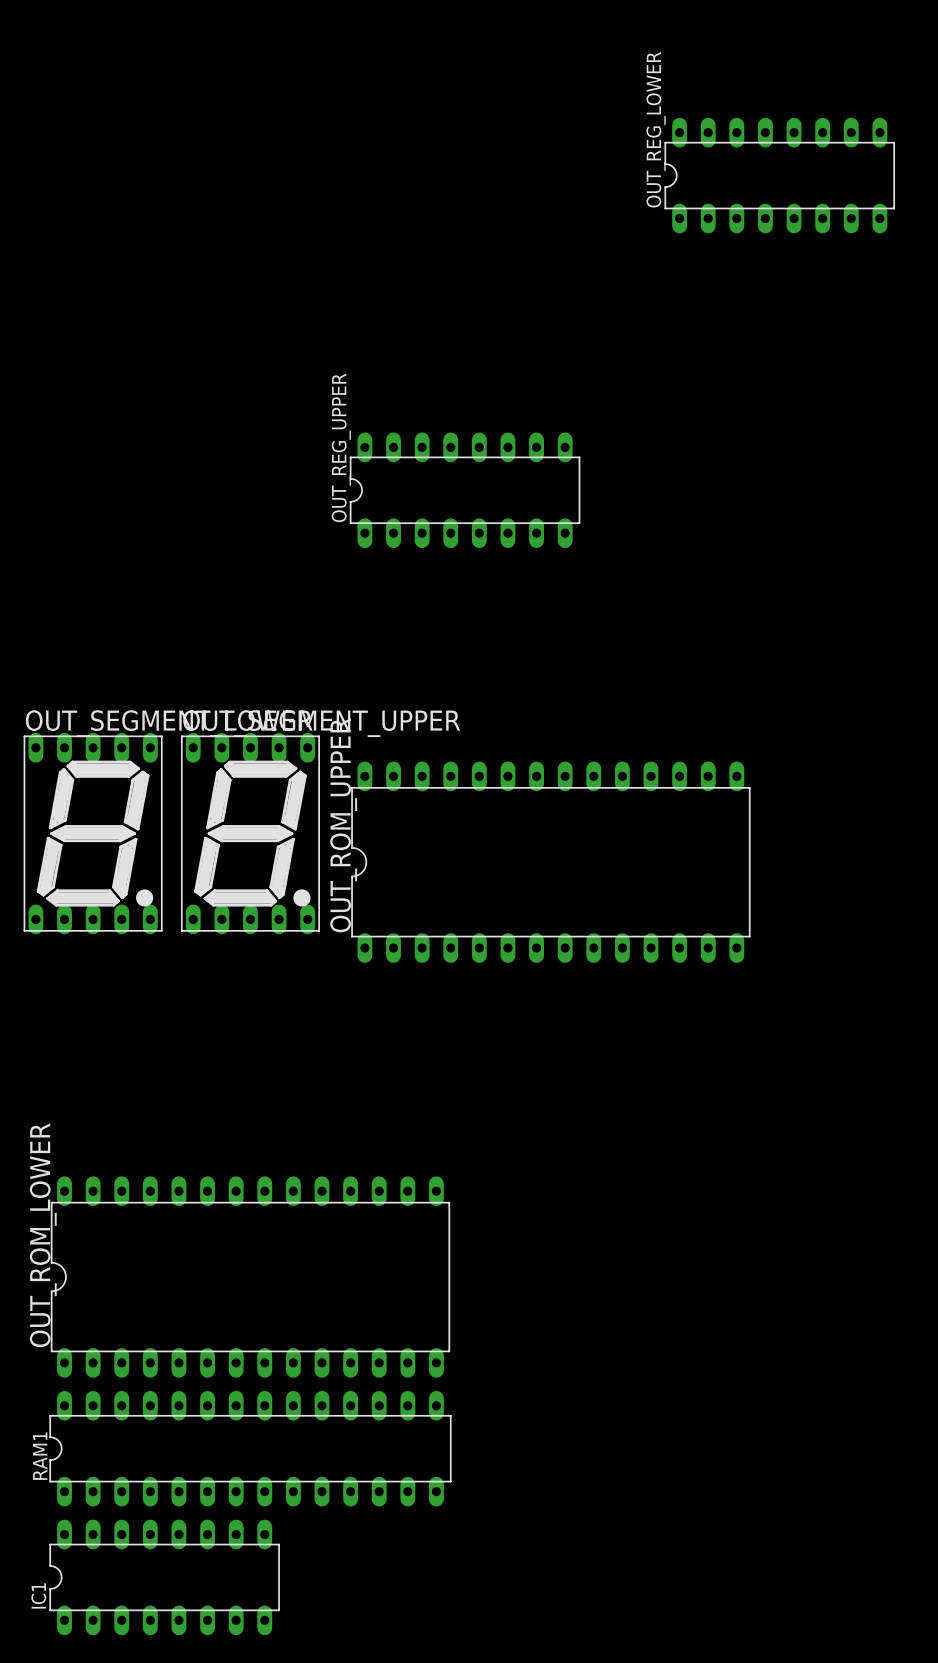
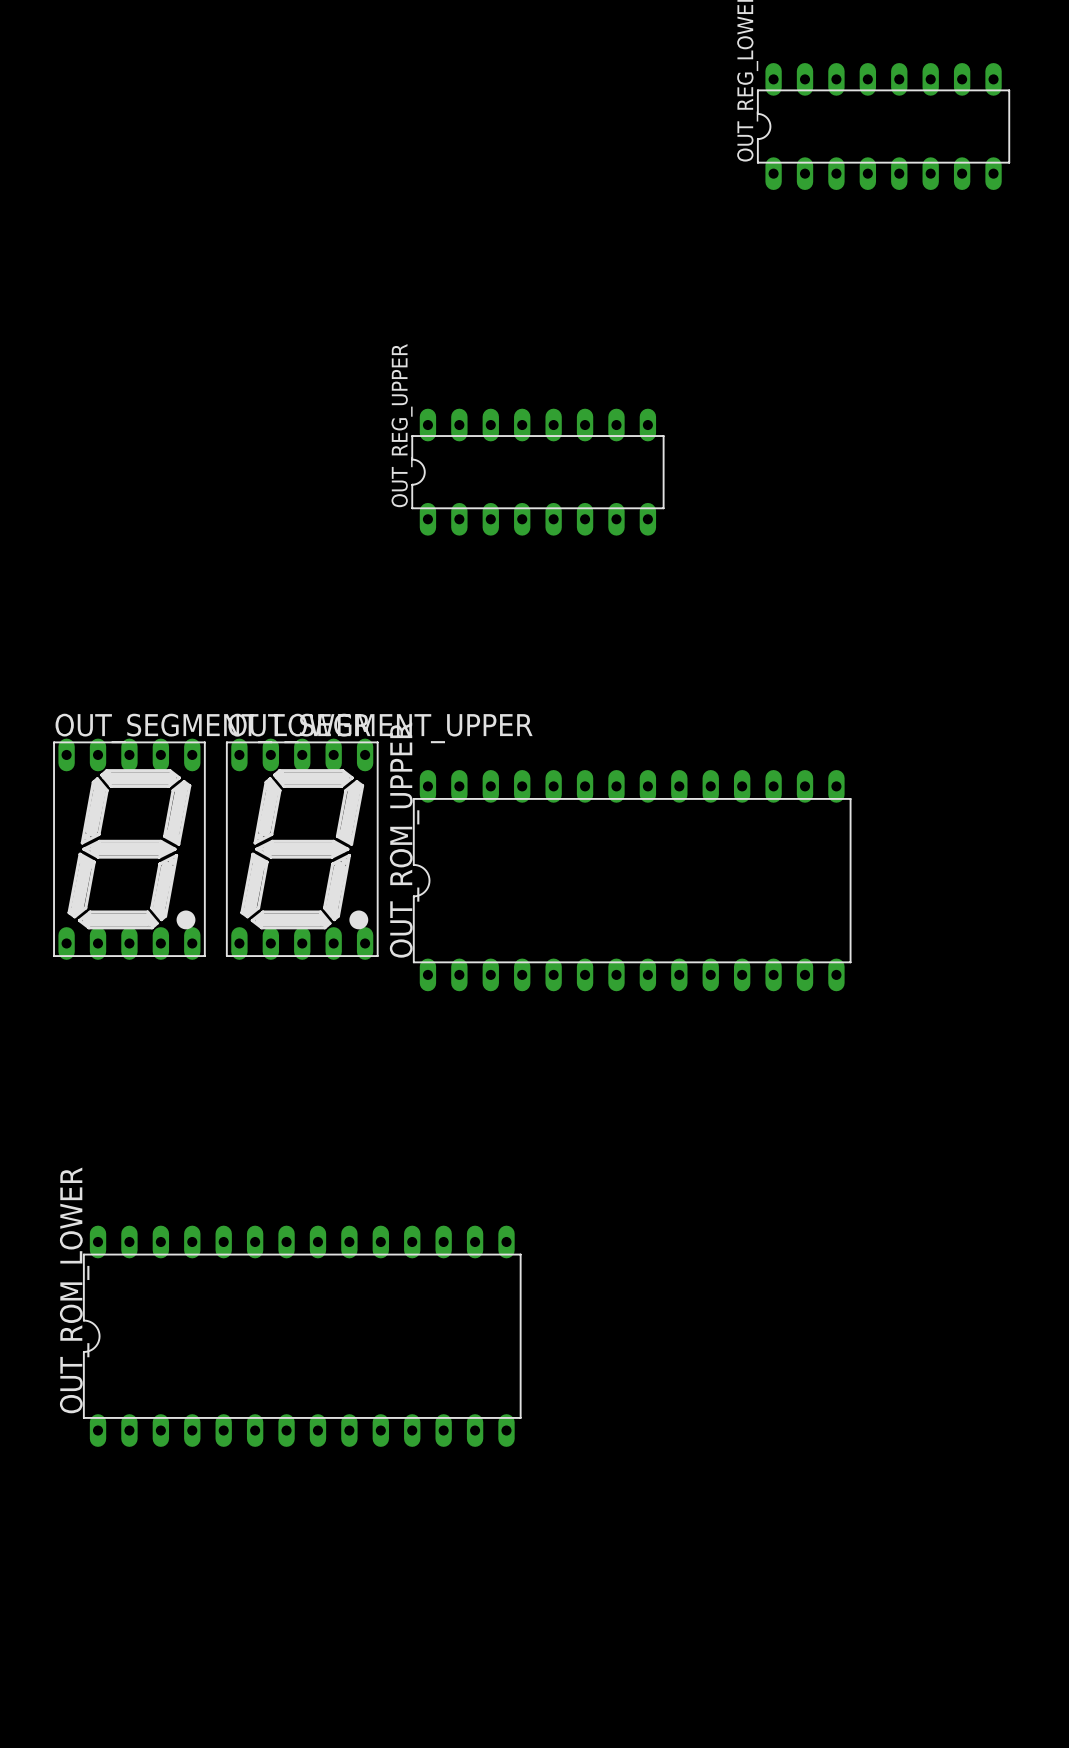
RAM1: (250, 1448) -> none
IC1: (164, 1577) -> none

